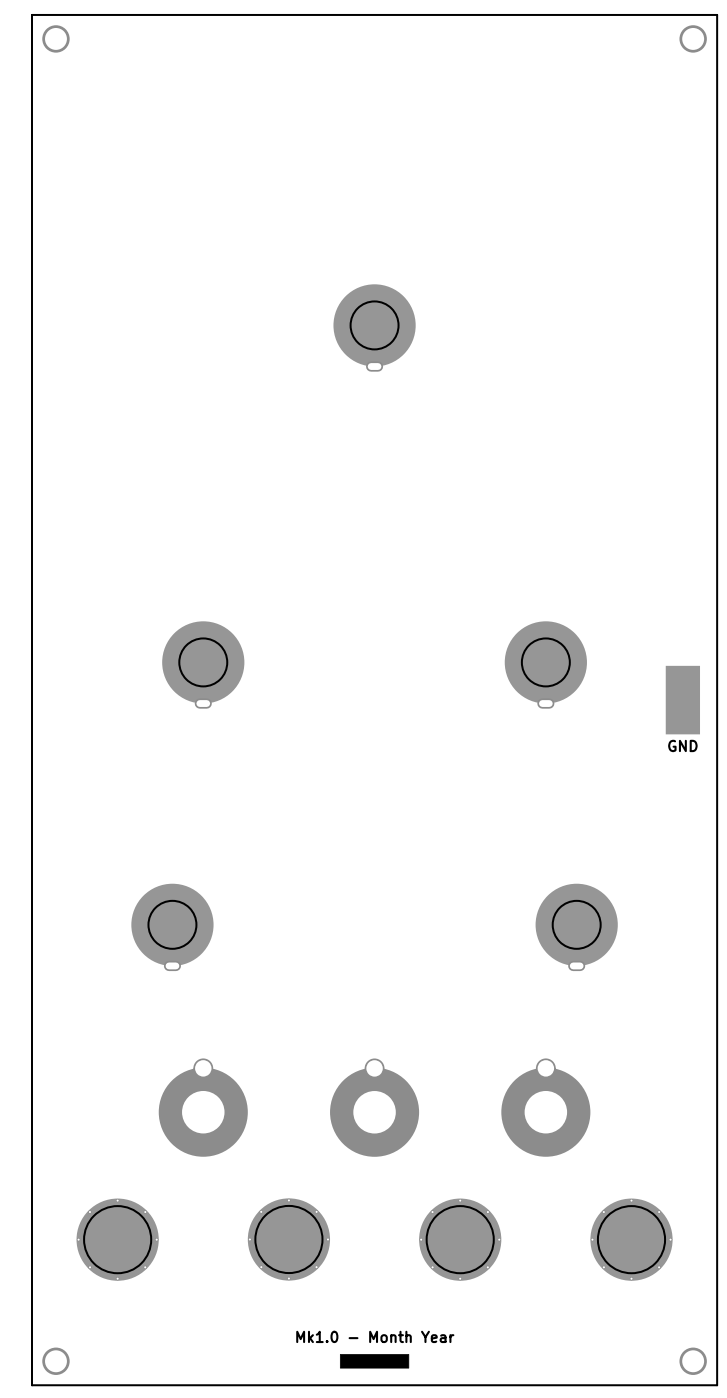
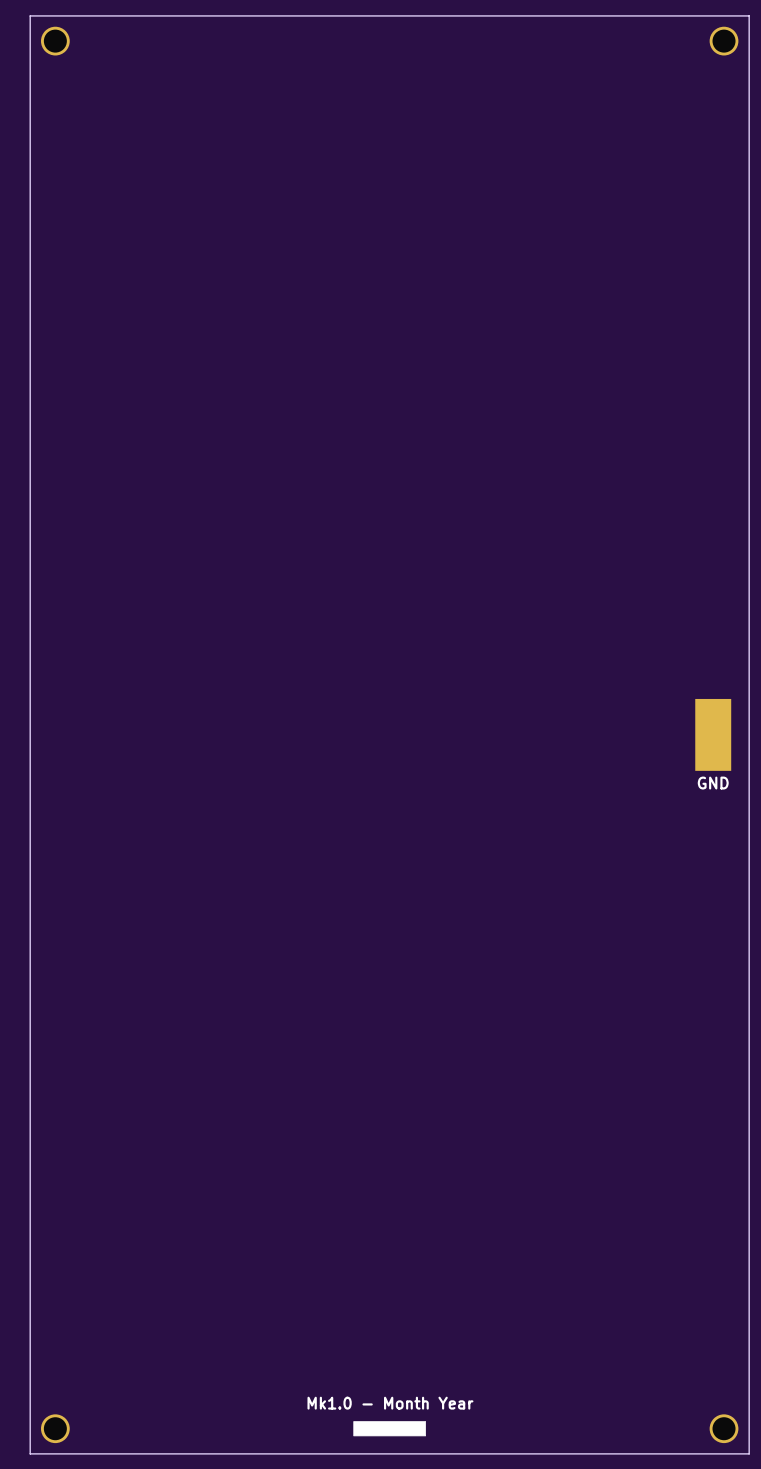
part: (374, 327) -> none
part: (203, 664) -> none
part: (545, 664) -> none
part: (172, 927) -> none
part: (576, 927) -> none
part: (203, 1107) -> none
part: (374, 1107) -> none
part: (545, 1107) -> none
part: (117, 1239) -> none
part: (288, 1239) -> none
part: (460, 1239) -> none
part: (631, 1239) -> none

